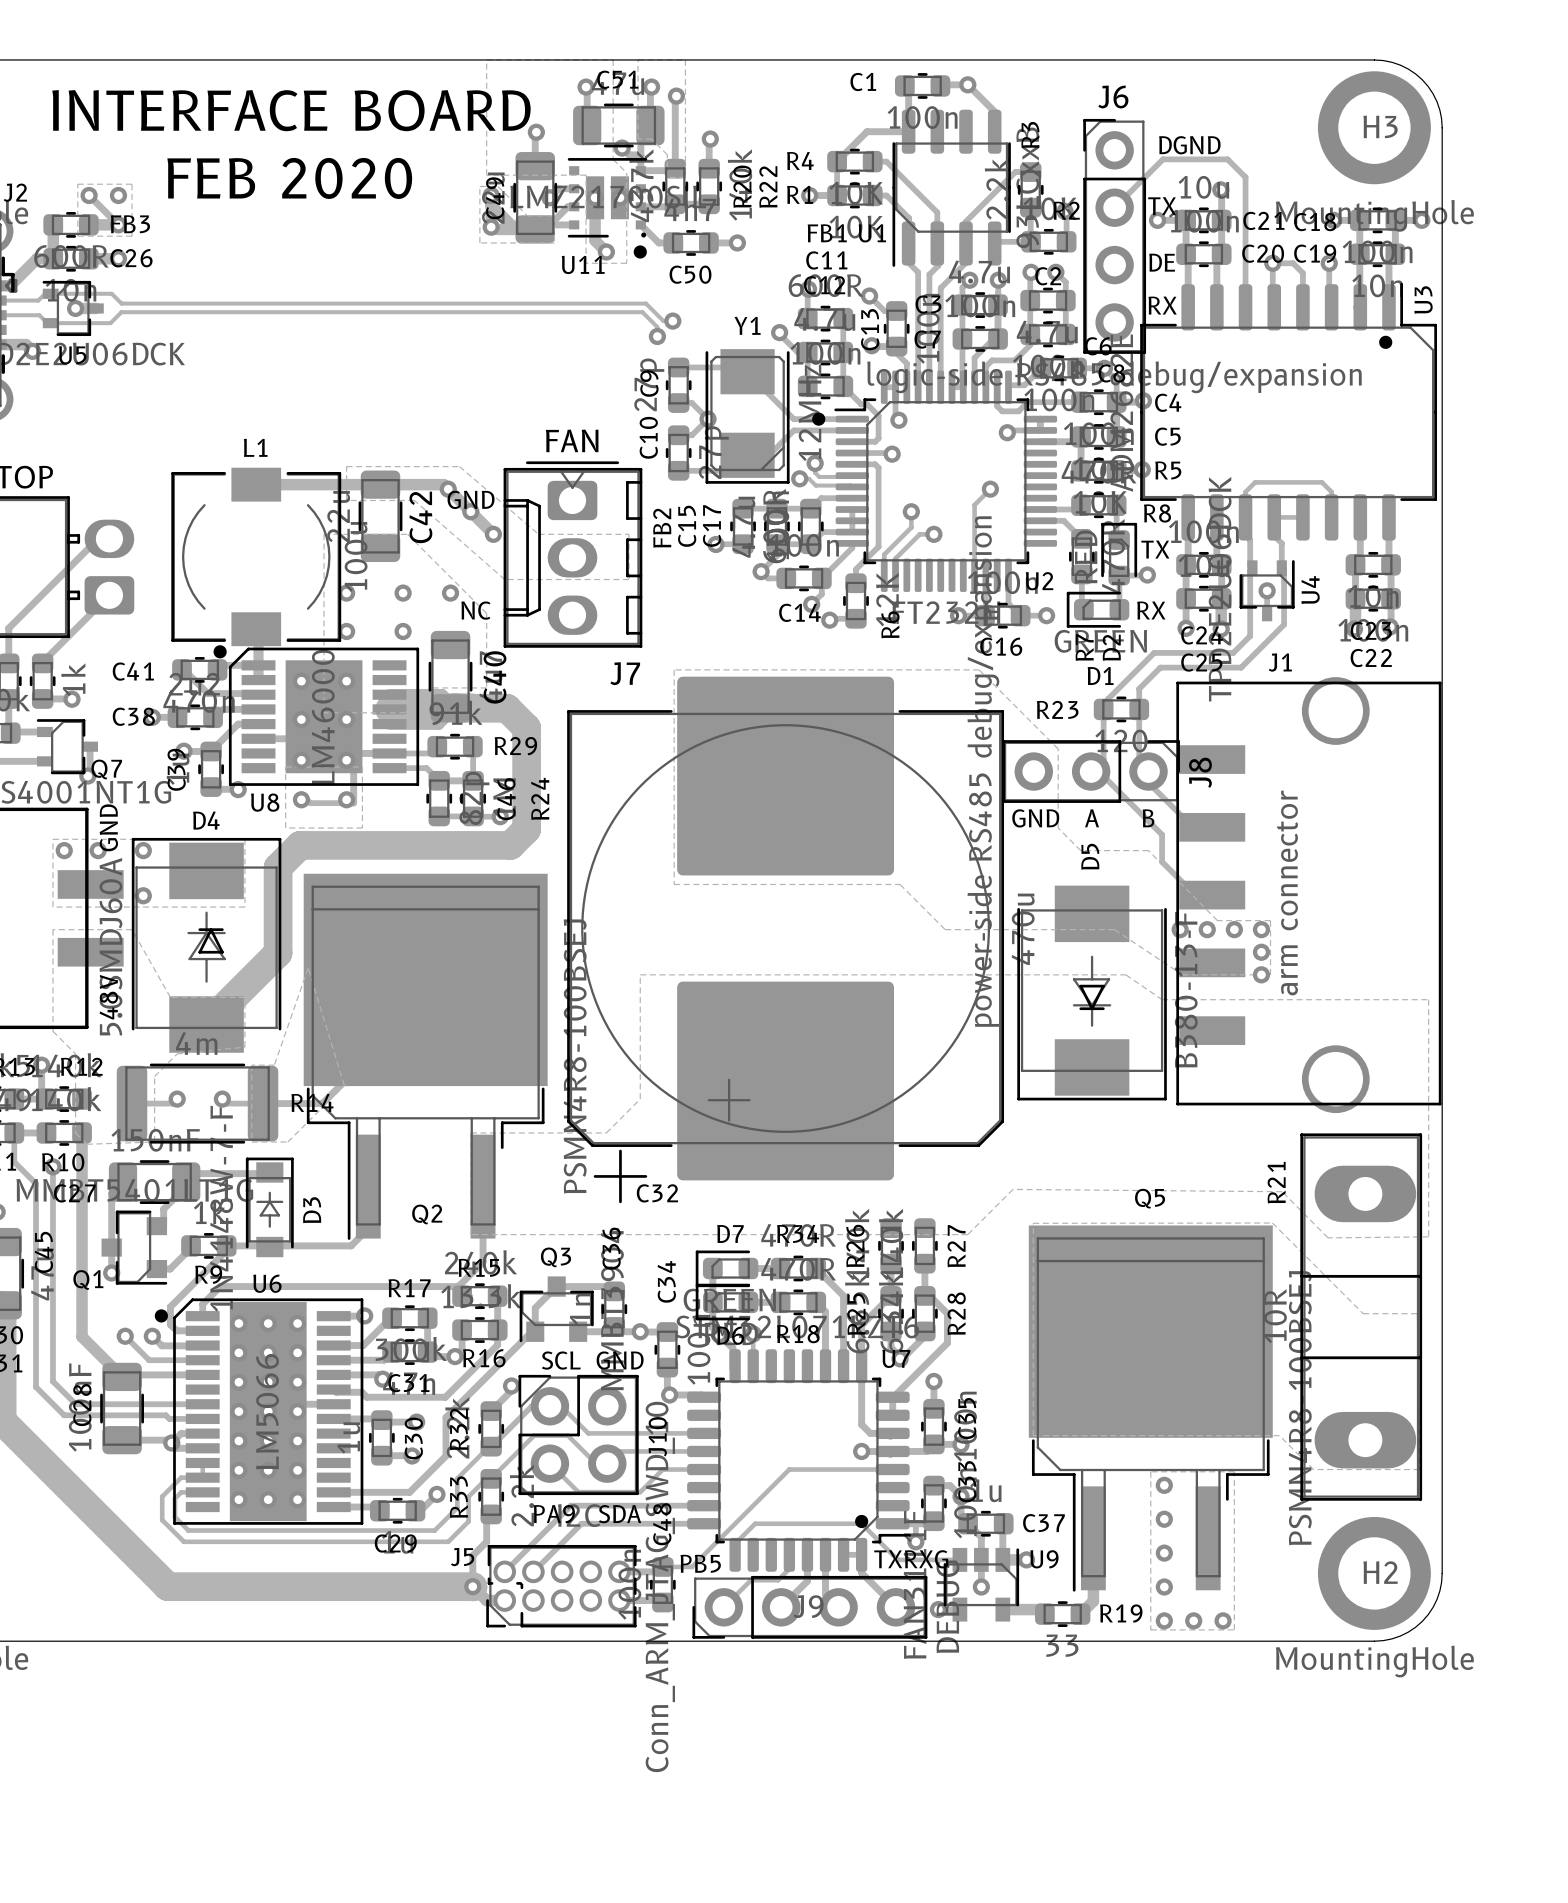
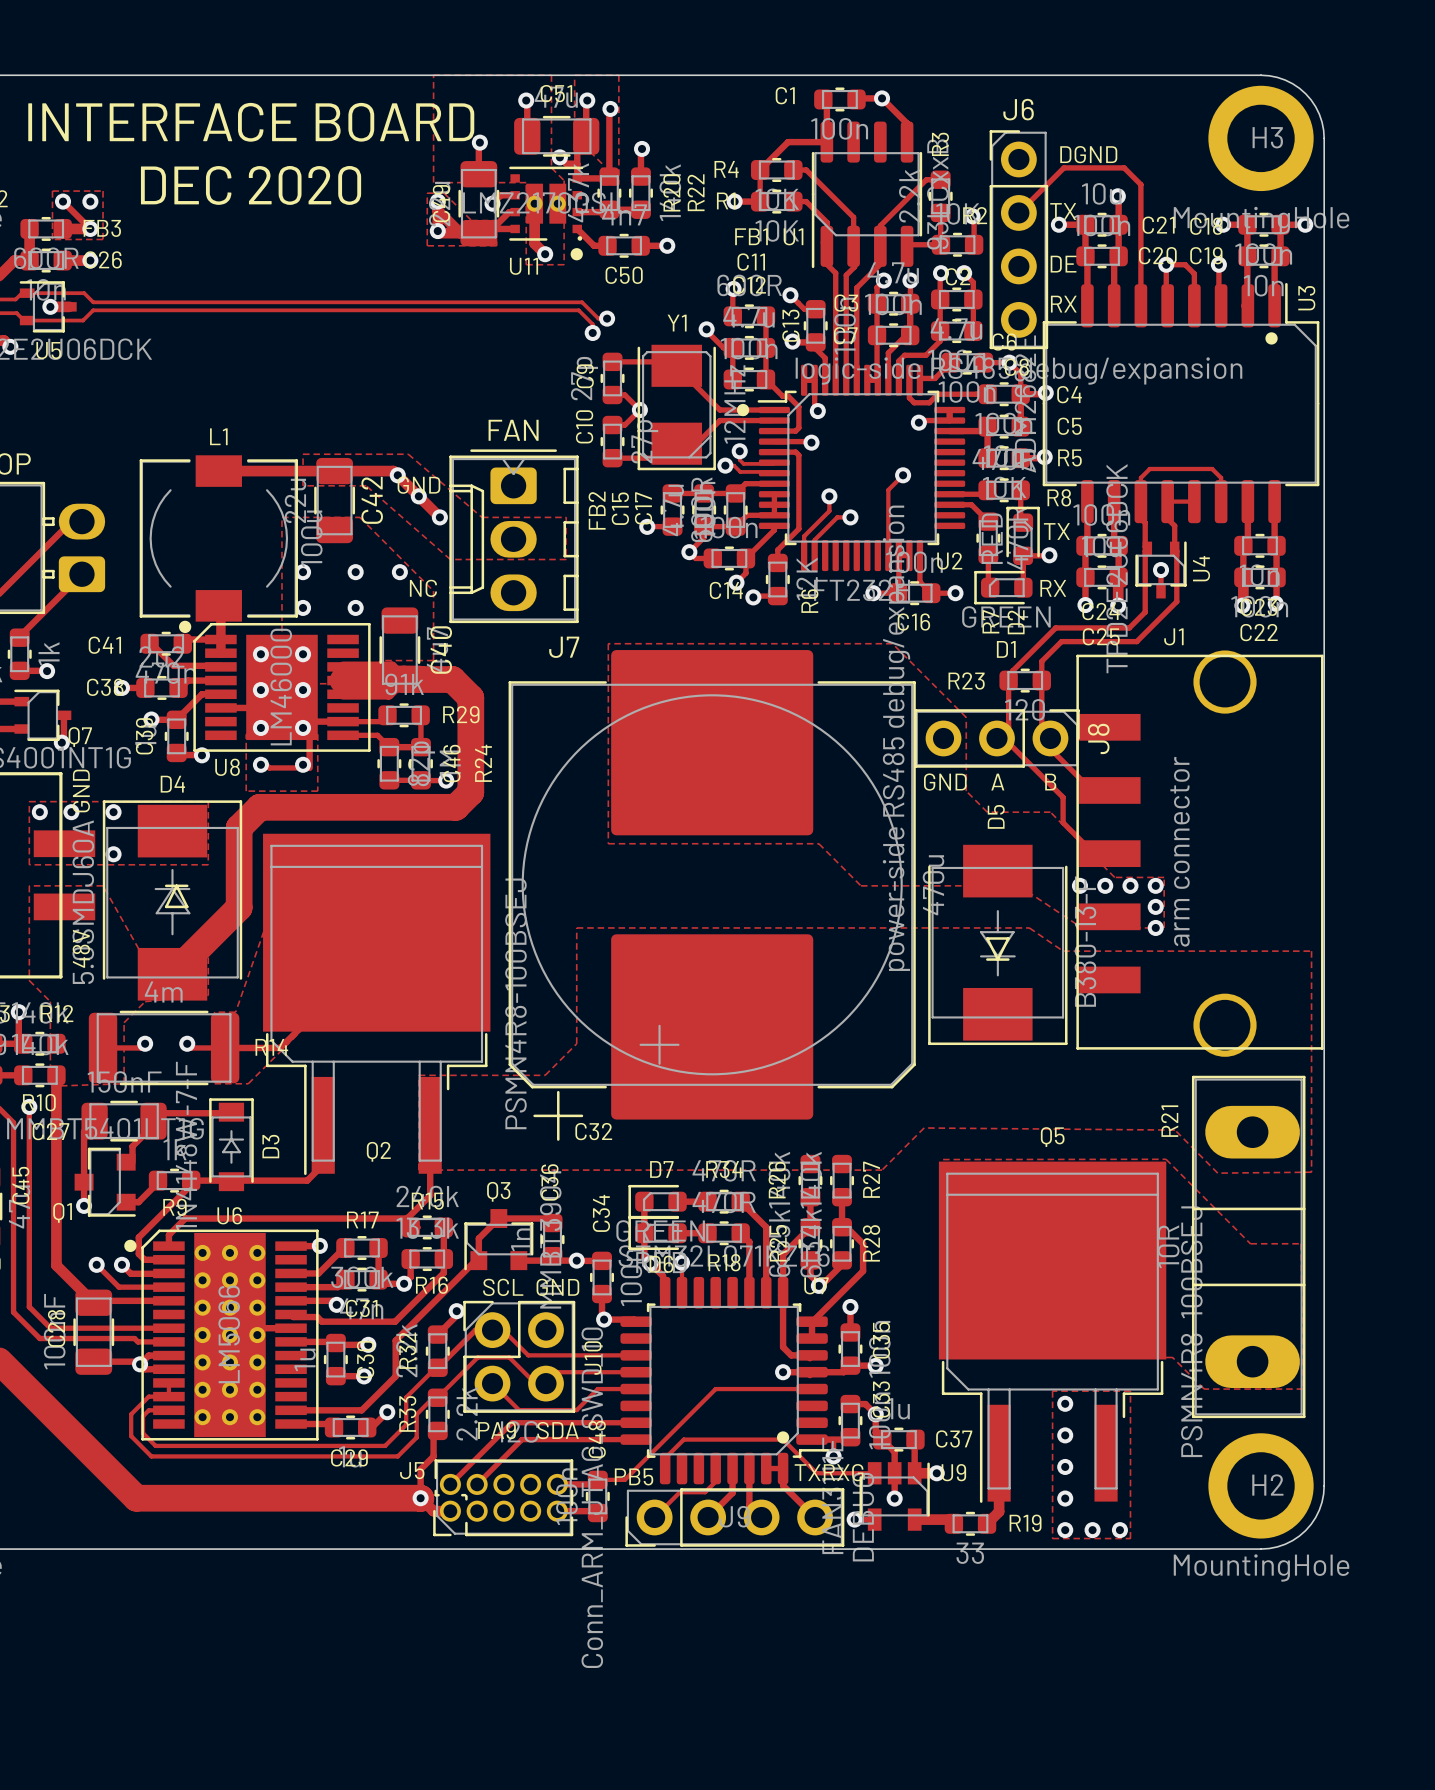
text: FEB 2020 (289, 178) -> DEC 2020 (251, 185)

